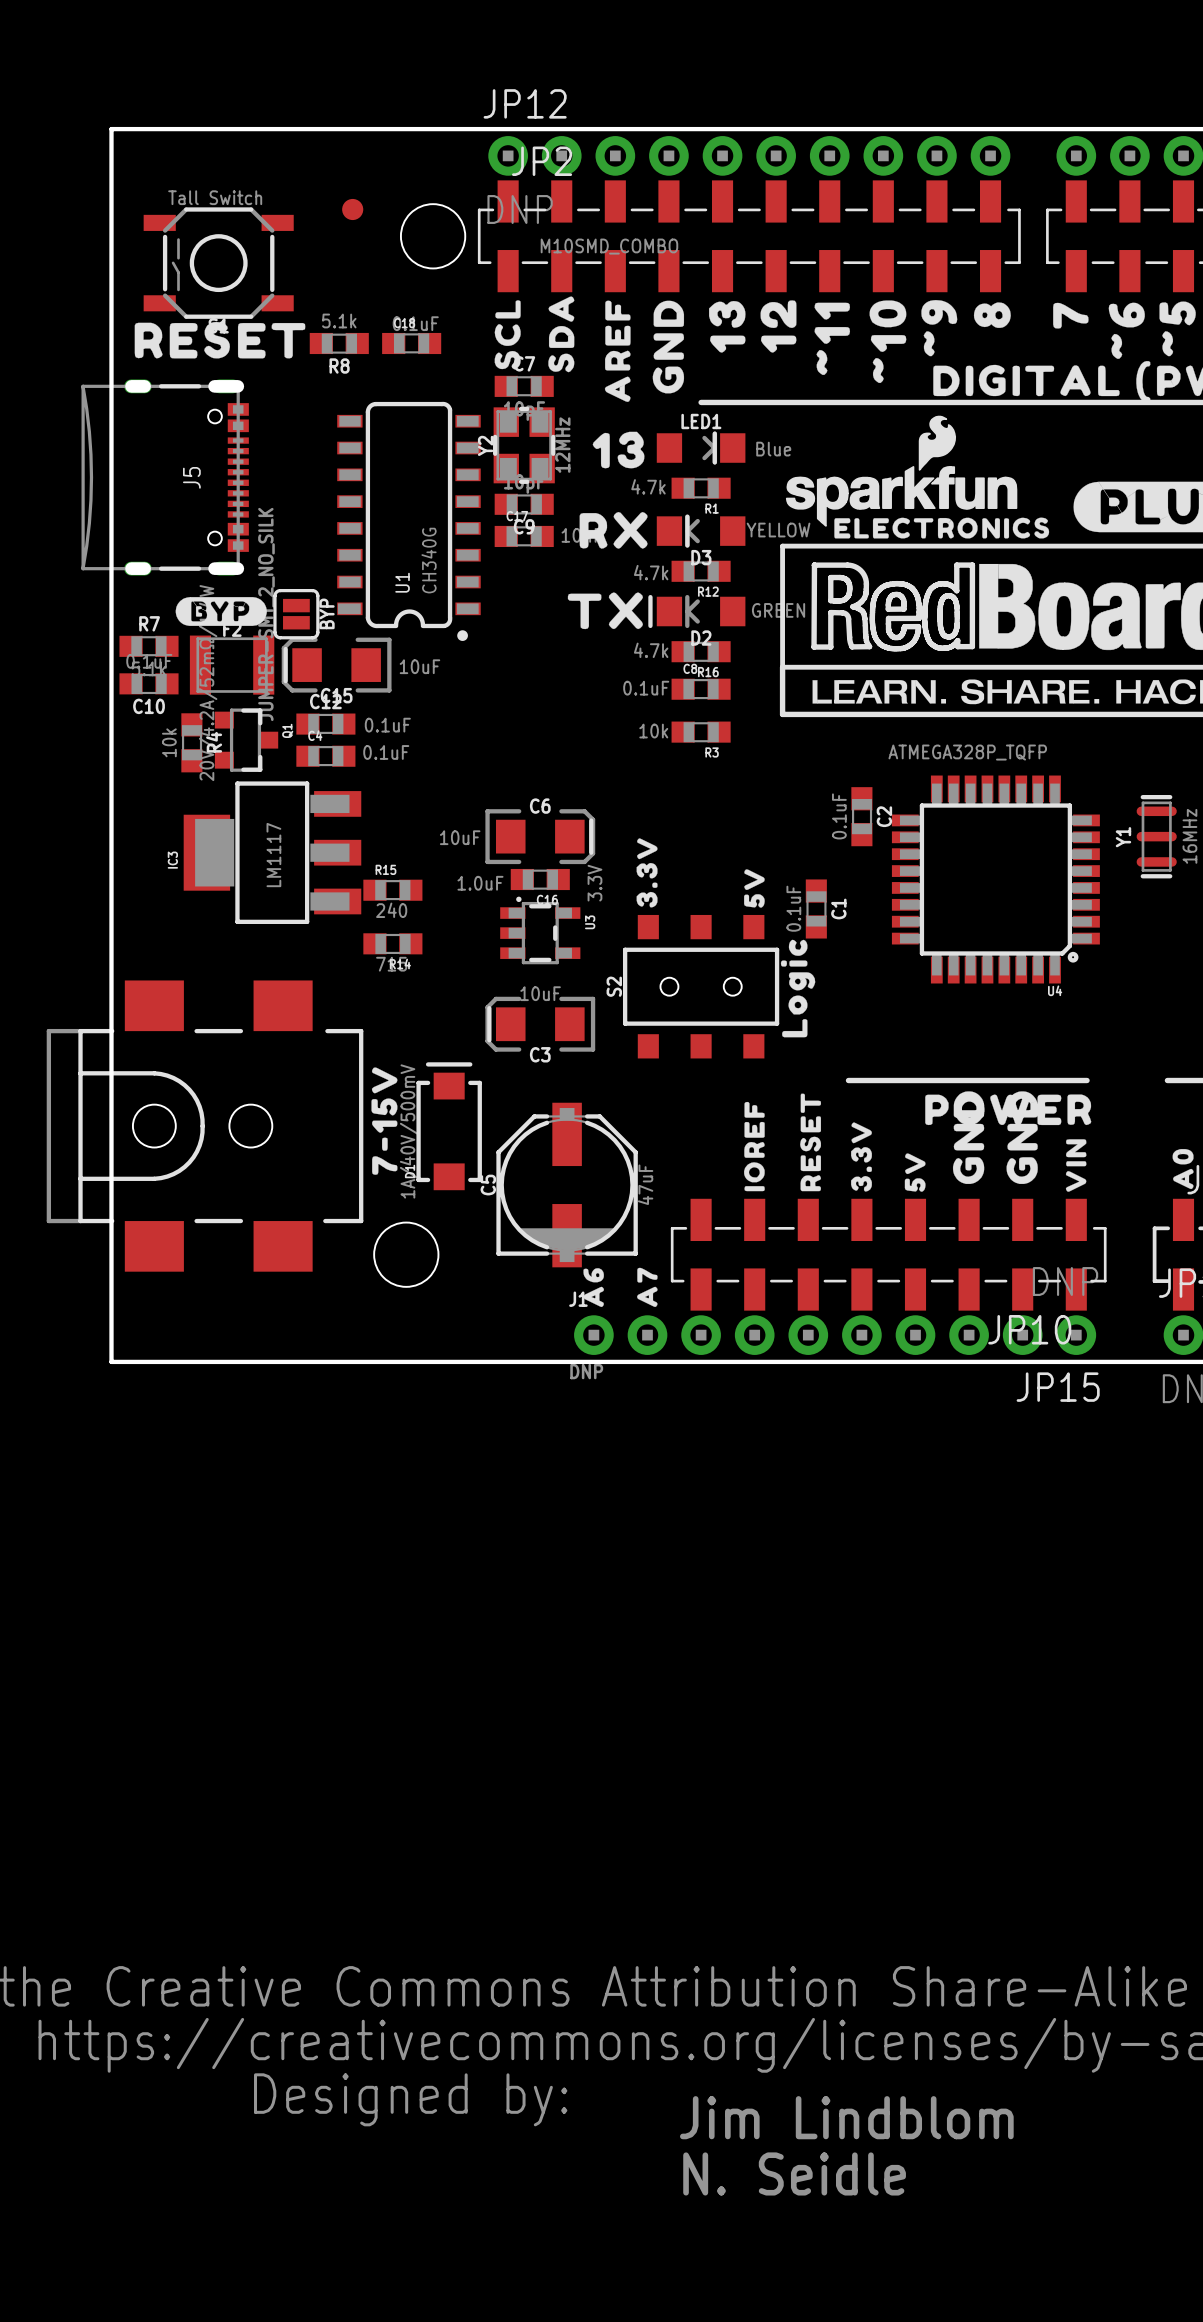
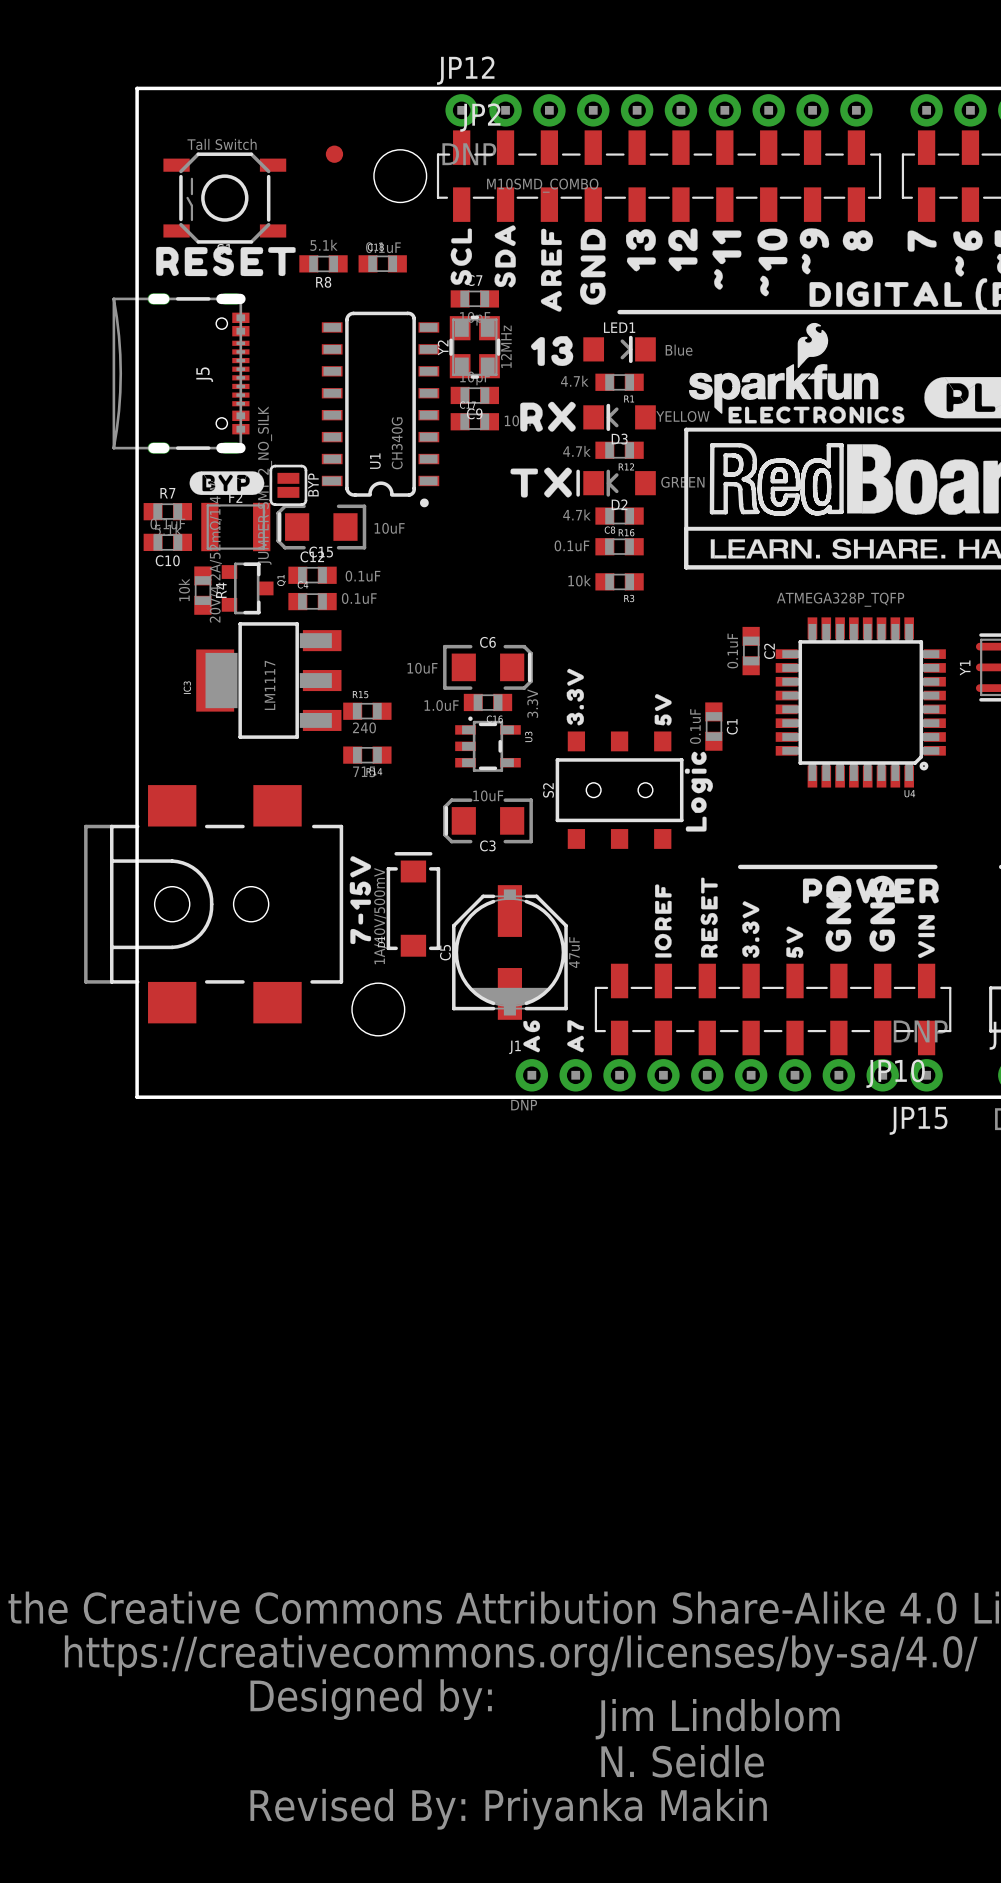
text: none -> Revised By: Priyanka Makin (508, 1809)

